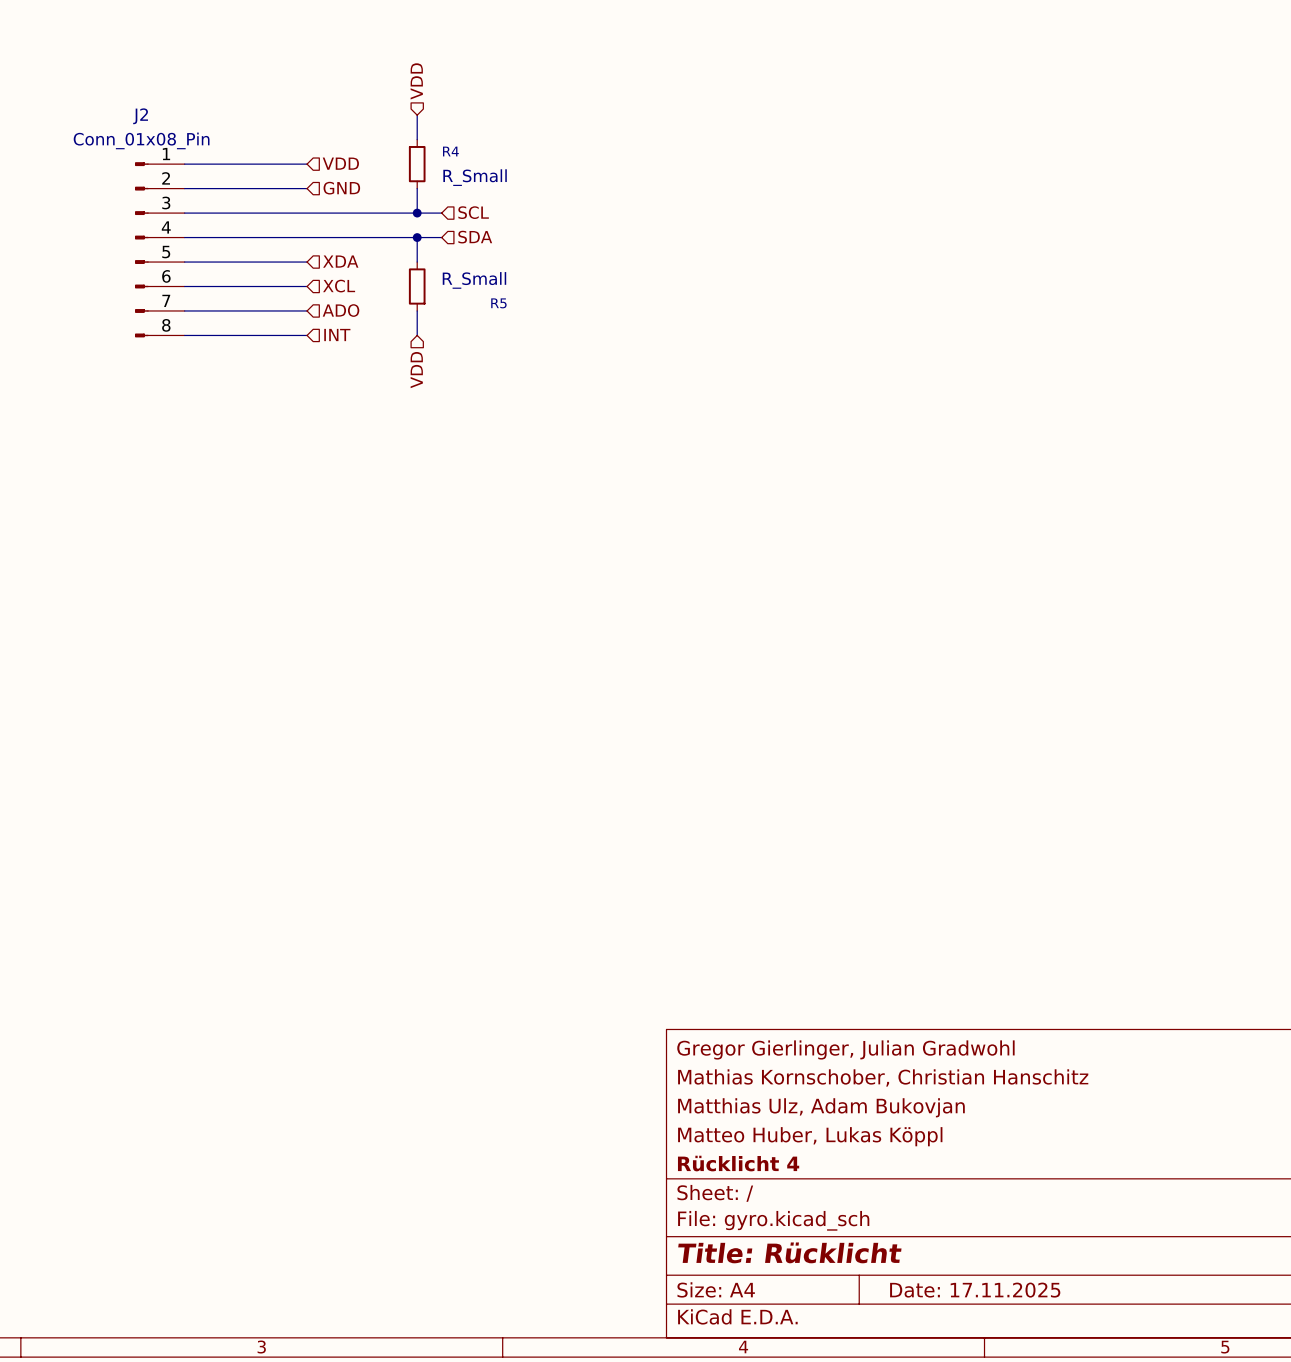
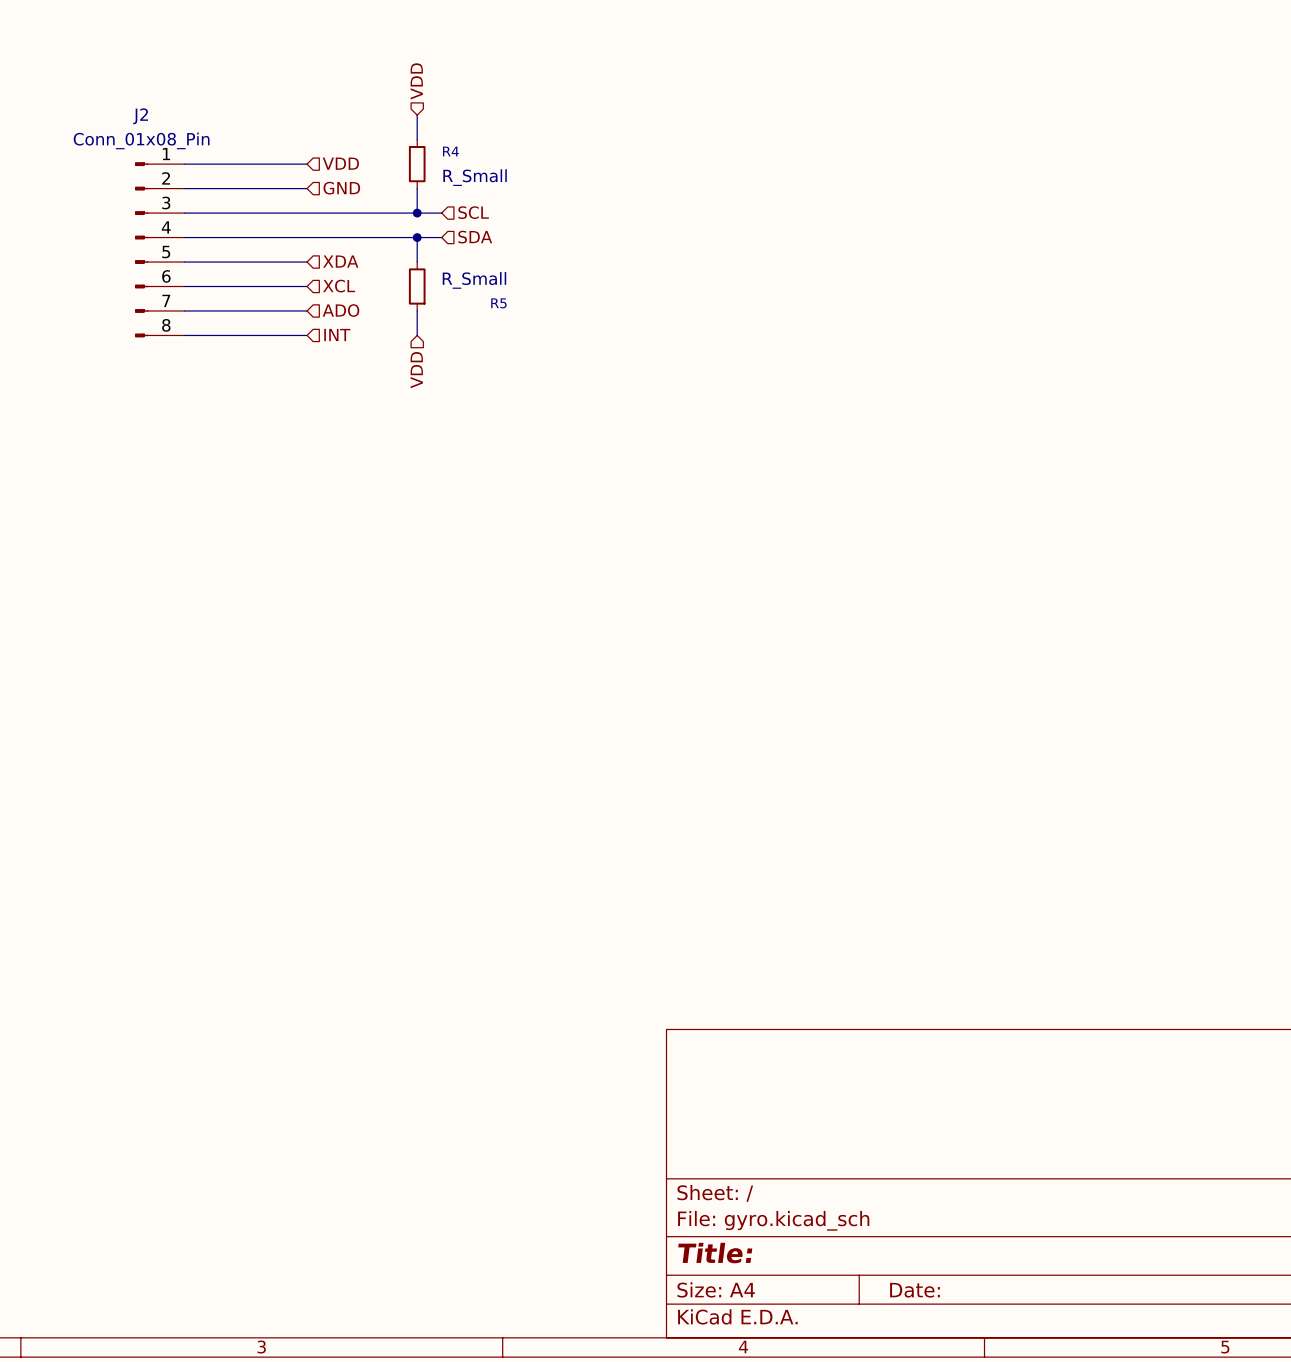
title block: Gregor Gierlinger, Julian Gradwohl (845, 1049) -> none
title block: Mathias Kornschober, Christian Hanschitz (883, 1077) -> none
title block: Matthias Ulz, Adam Bukovjan (821, 1107) -> none
title block: Matteo Huber, Lukas Köppl (810, 1136) -> none
title block: Rücklicht 4 (738, 1163) -> none
title block: Title: Rücklicht (789, 1252) -> Title: (715, 1253)
title block: Date: 17.11.2025 (975, 1290) -> Date: (914, 1290)

